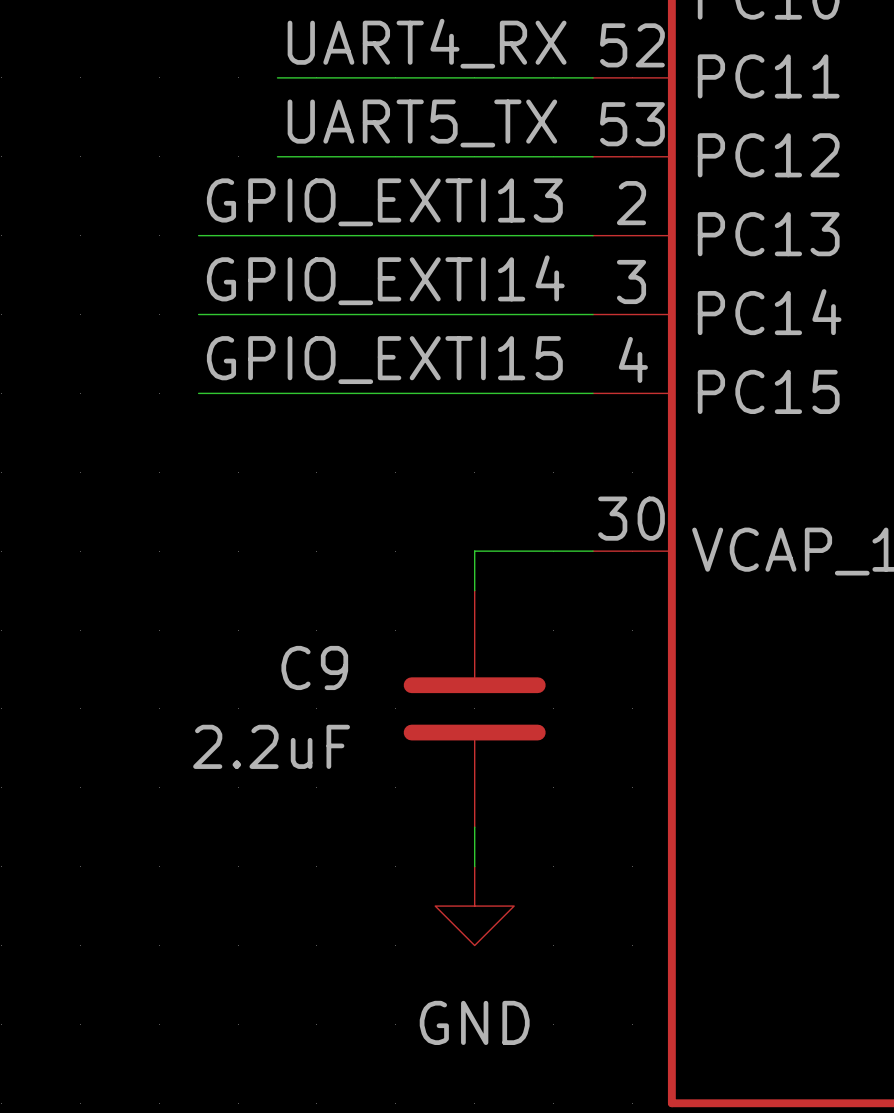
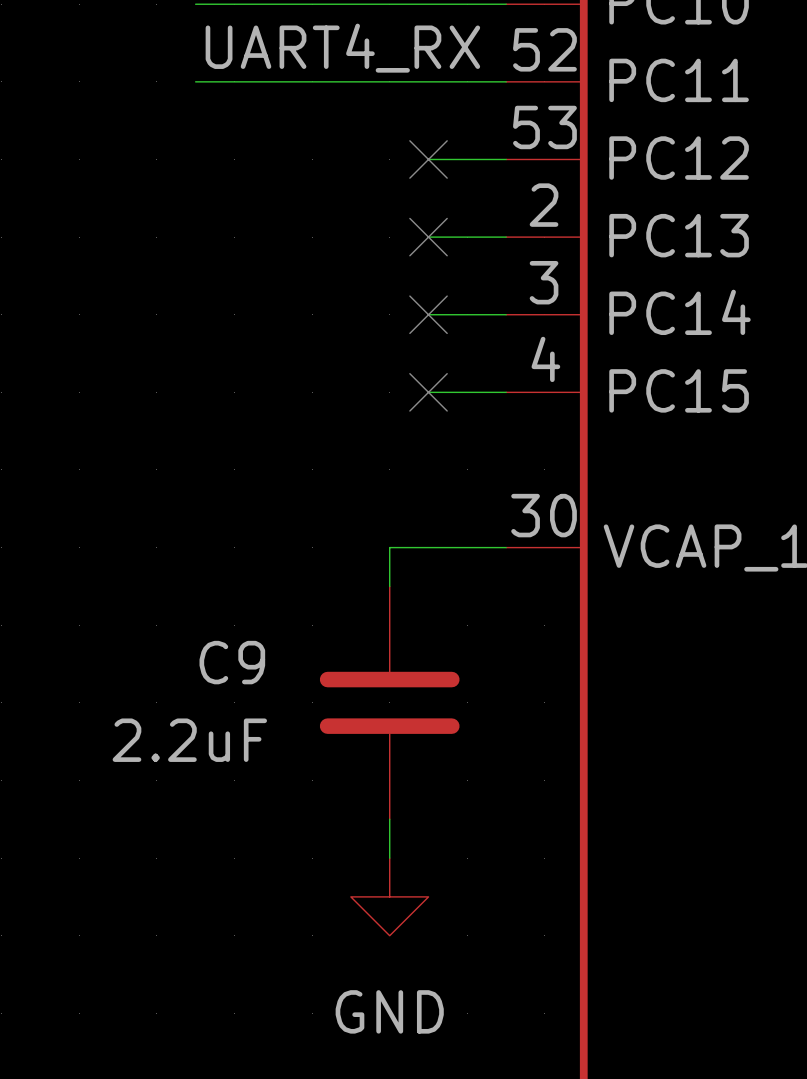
label: UART5_TX (422, 123) -> none
wire: (277, 156) (514, 156) -> none
no-connect mark: none -> (428, 159)
label: GPIO_EXTI13 (384, 202) -> none
wire: (198, 235) (514, 235) -> none
no-connect mark: none -> (428, 237)
label: GPIO_EXTI14 (385, 280) -> none
wire: (198, 314) (514, 314) -> none
no-connect mark: none -> (428, 314)
label: GPIO_EXTI15 (384, 360) -> none
wire: (198, 393) (514, 393) -> none
no-connect mark: none -> (428, 392)

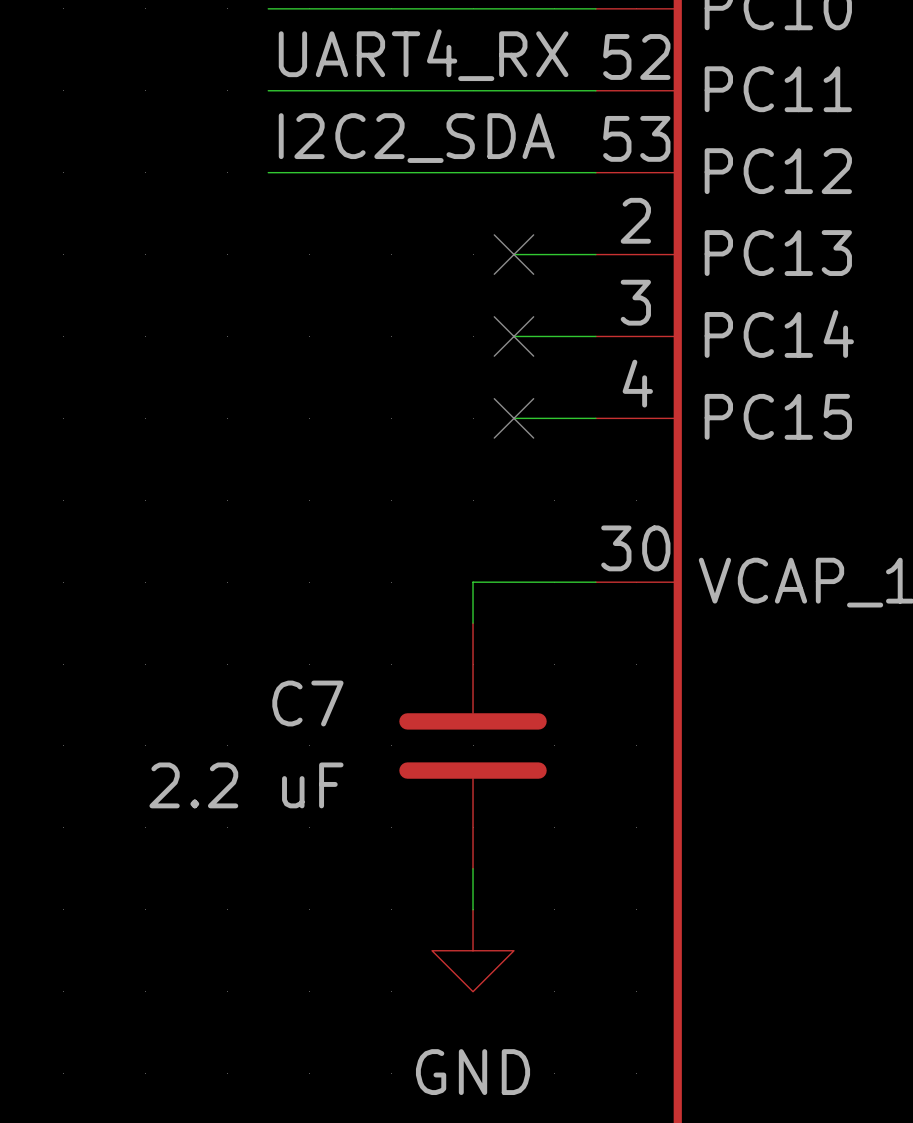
label: none -> I2C2_SDA (416, 138)
wire: none -> (268, 172) (513, 172)
no-connect mark: (428, 159) -> none
C9 name: C9 (232, 662) -> C7 (307, 703)
C9 value: 2.2uF (189, 740) -> 2.2 uF (246, 785)

